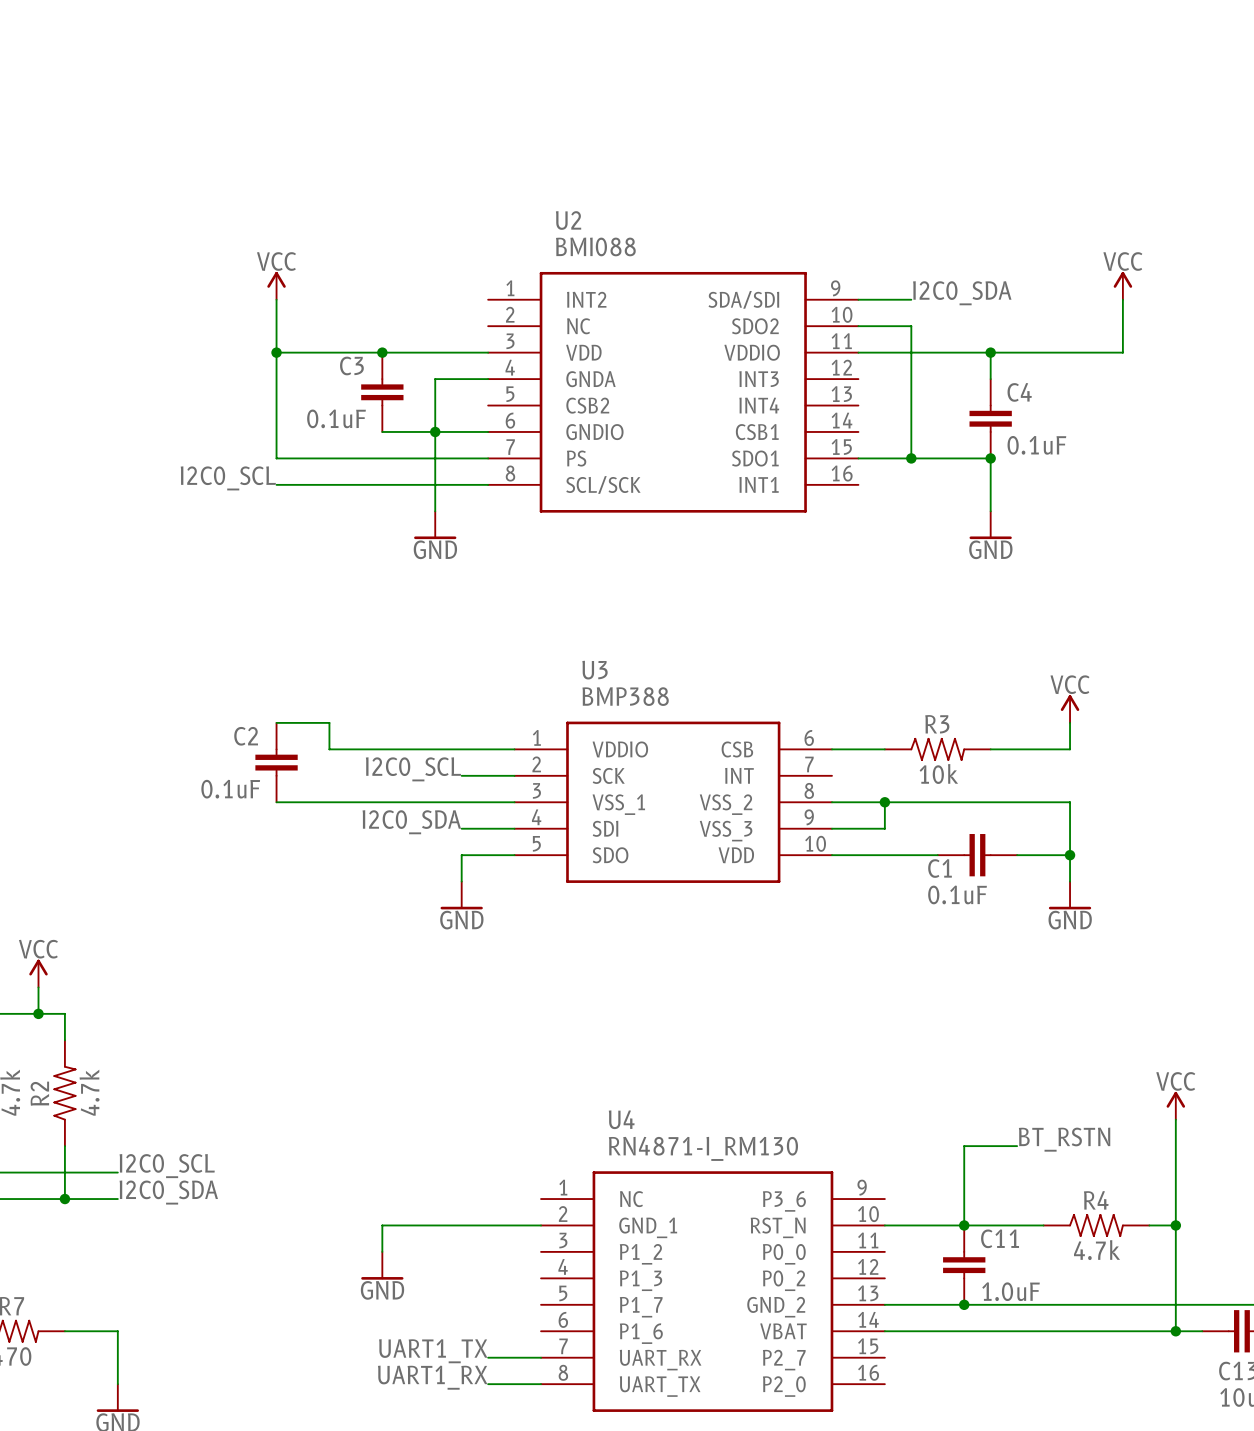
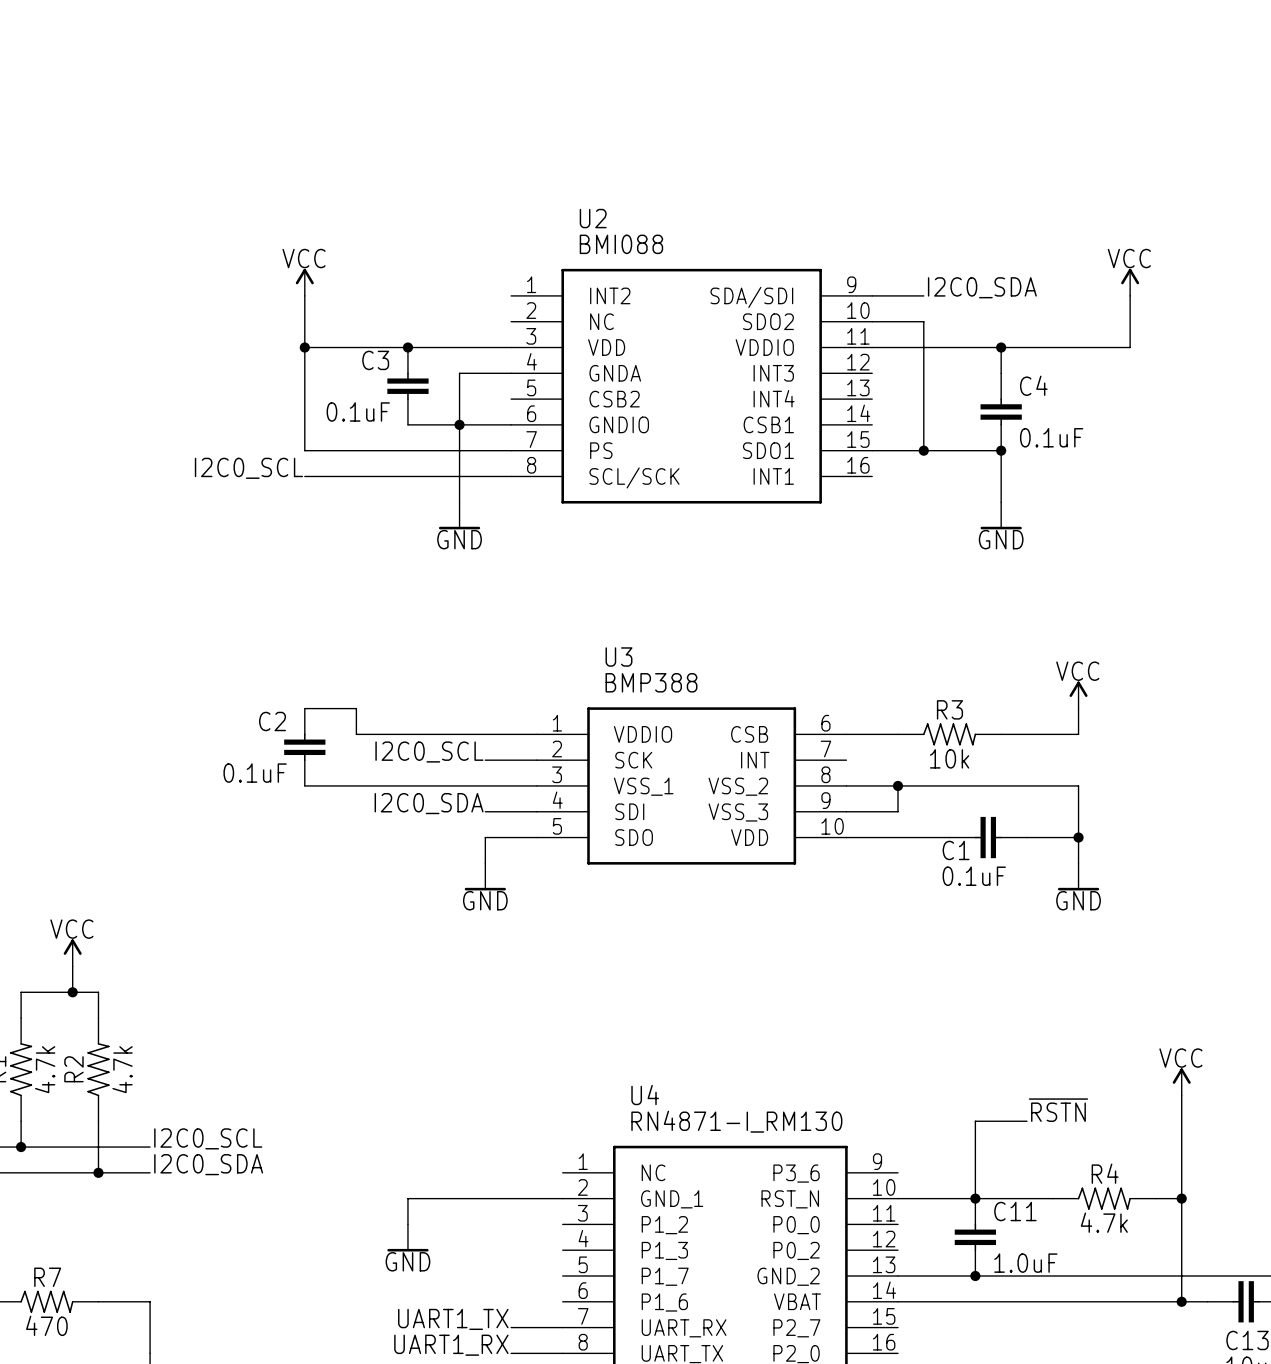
label: BT_RSTN (1064, 1139) -> ~{RSTN} (1058, 1110)

